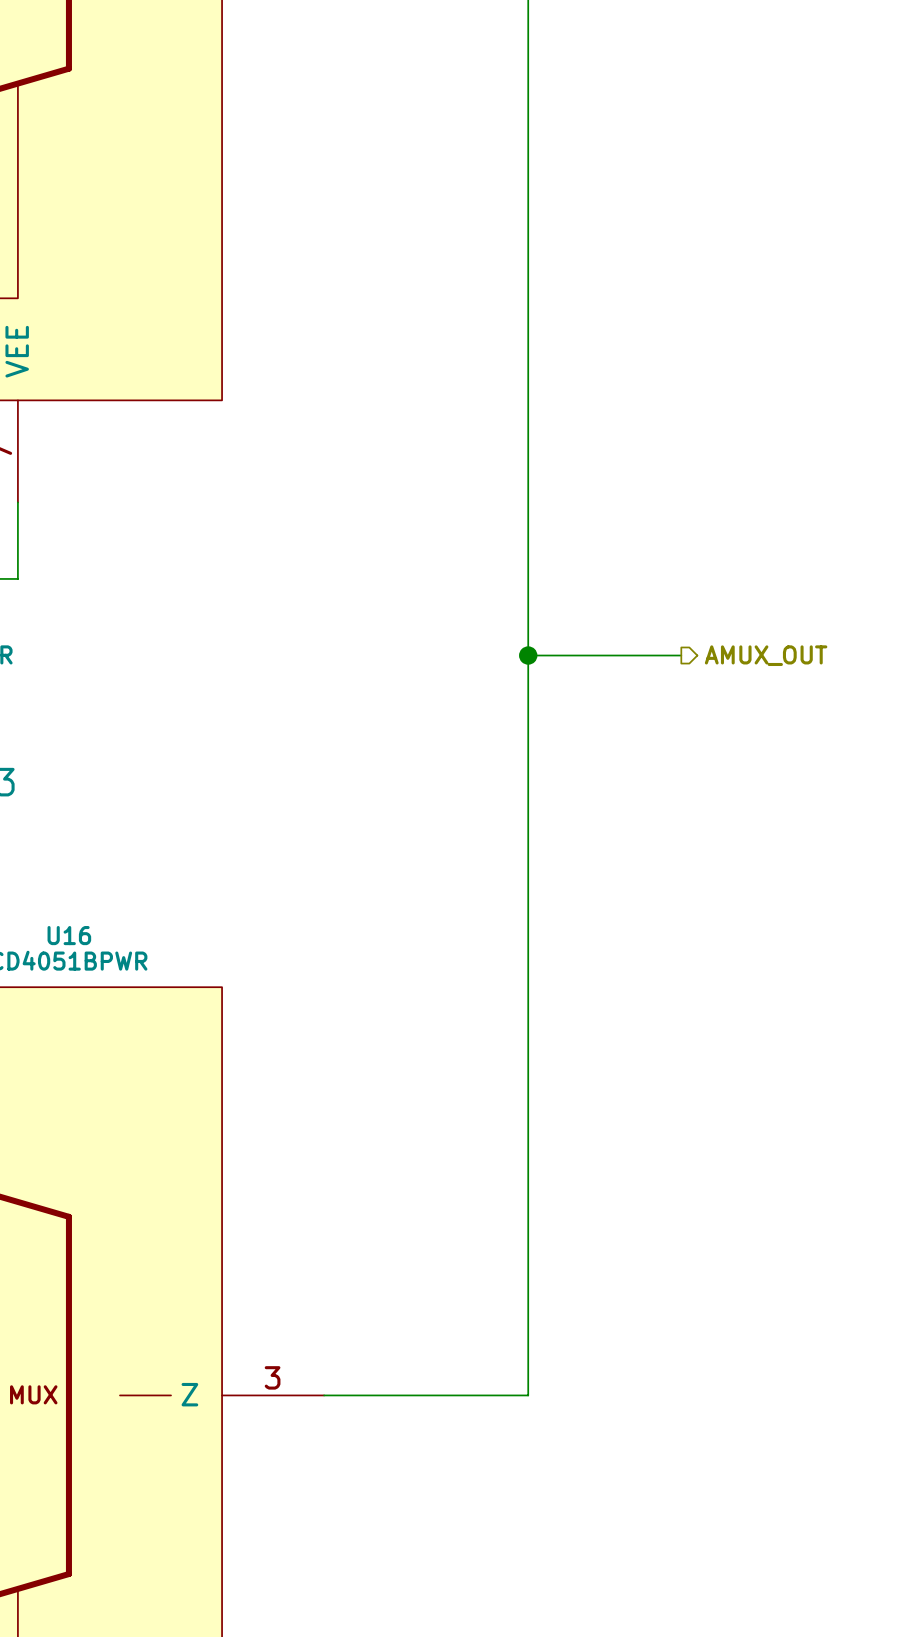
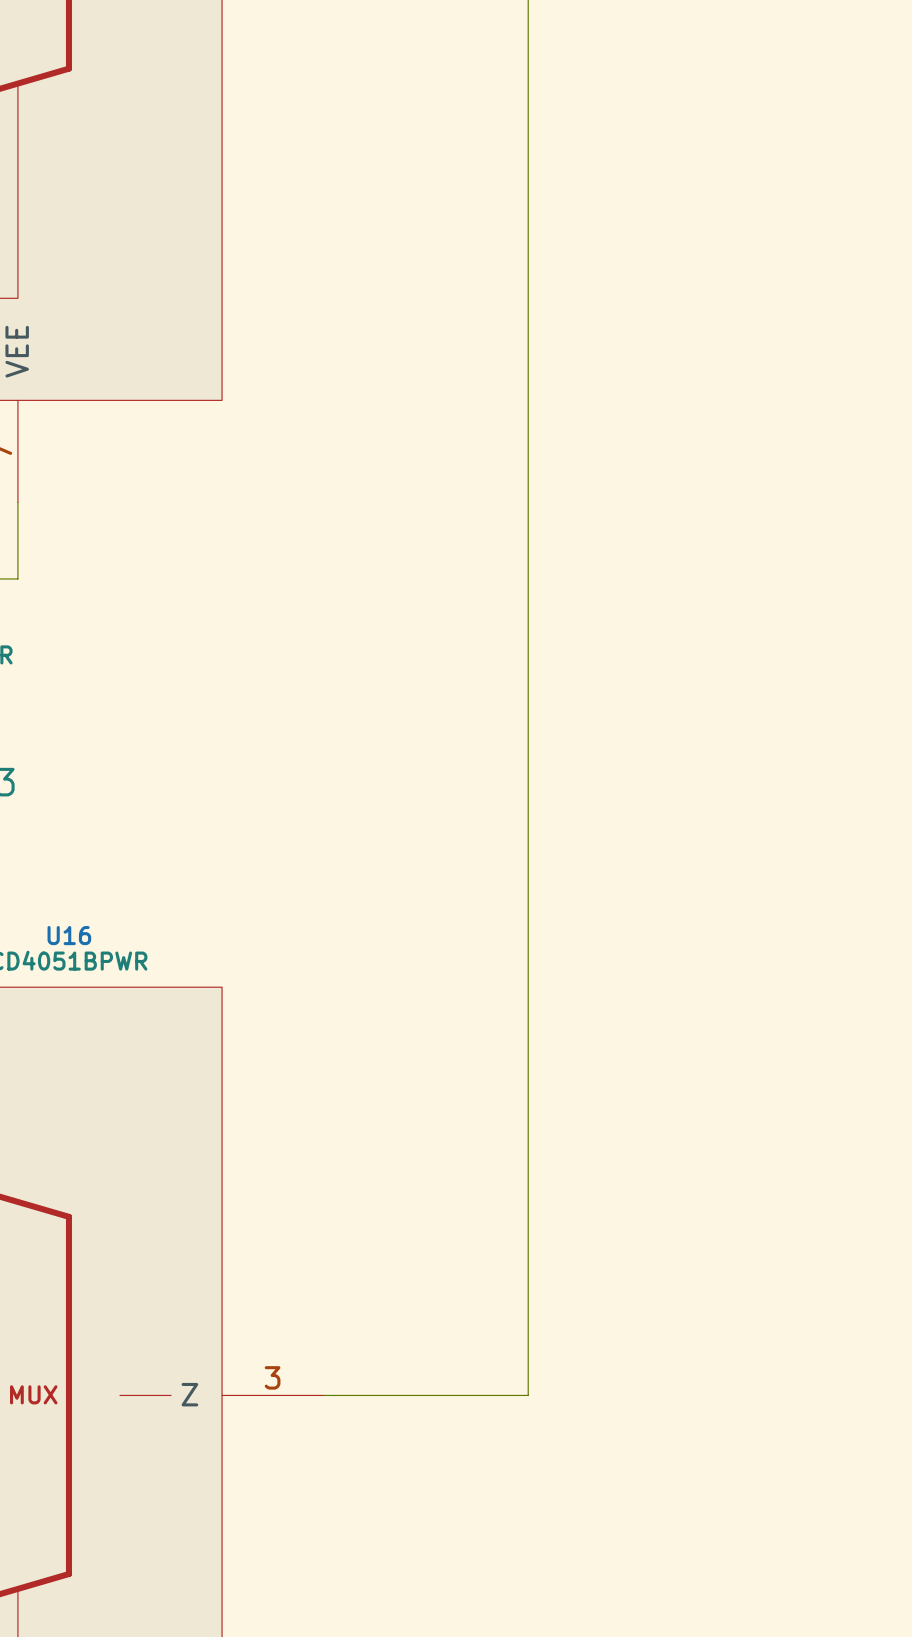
wire: (528, 655) (681, 655) -> none
junction: (528, 655) -> none
hierarchical label: AMUX_OUT (766, 655) -> none

